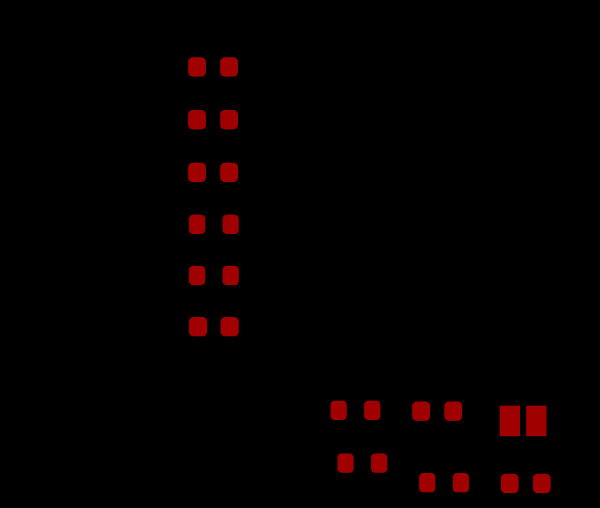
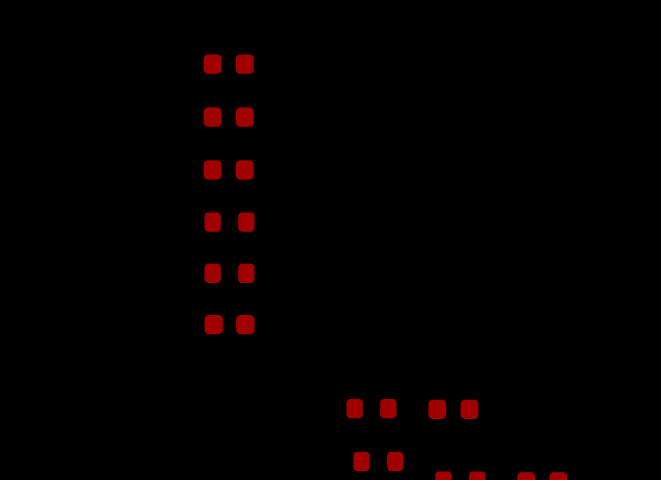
part: (523, 420) -> none

